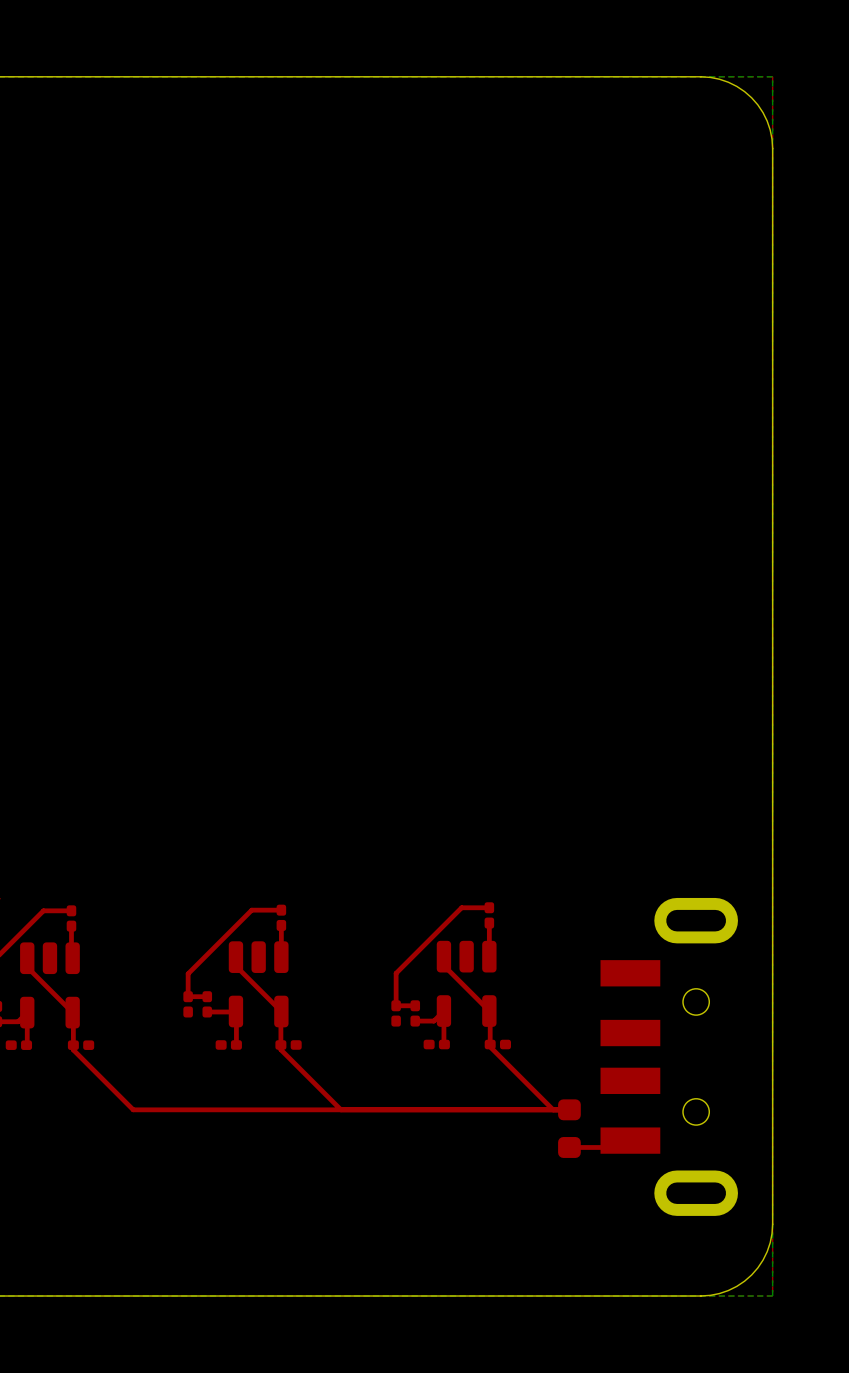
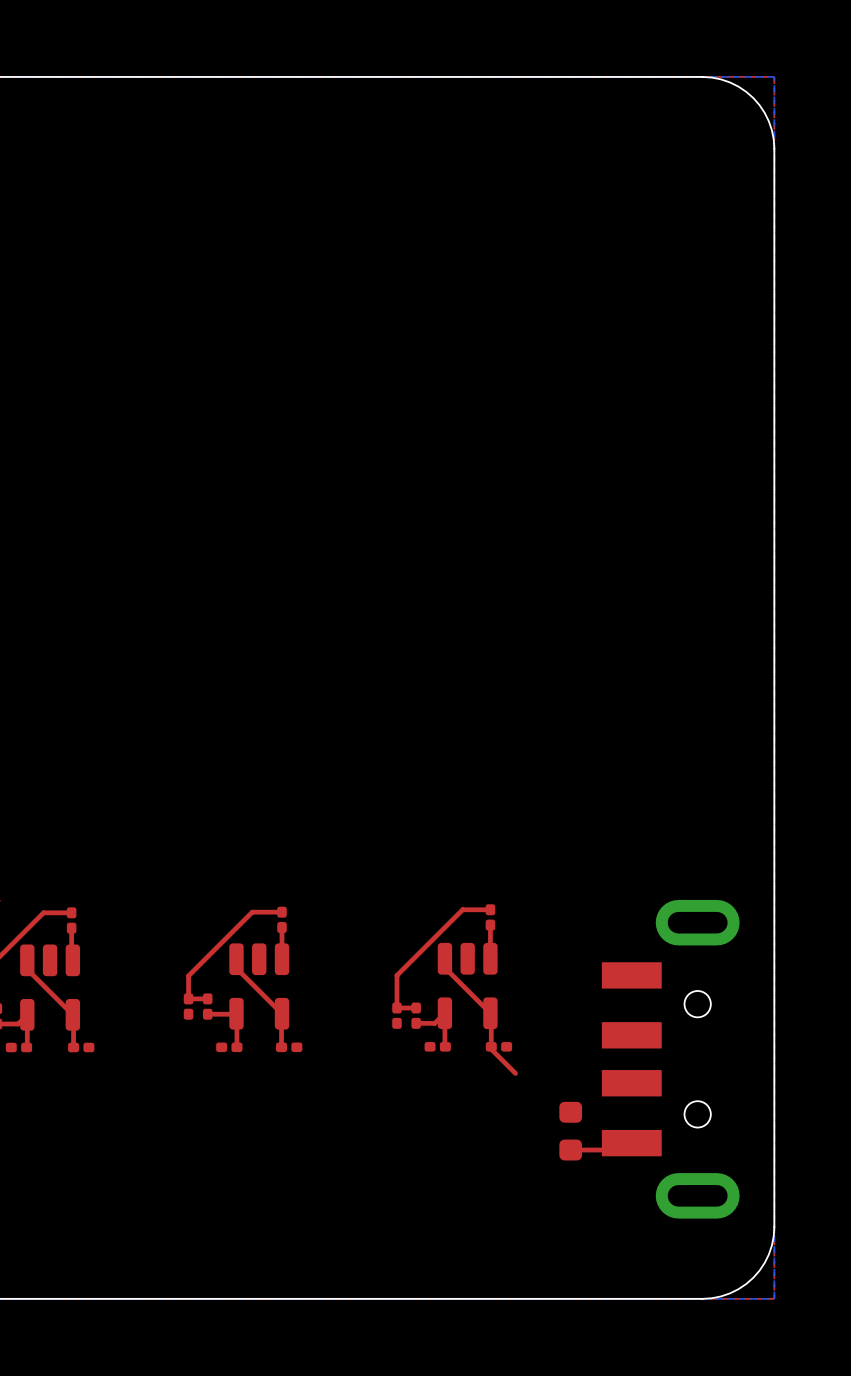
top track: (280, 1044) (280, 1049) (340, 1109) -> none
top track: (73, 1045) (73, 1049) (133, 1109) (569, 1109) -> none
top track: (514, 1071) (553, 1109) -> none

